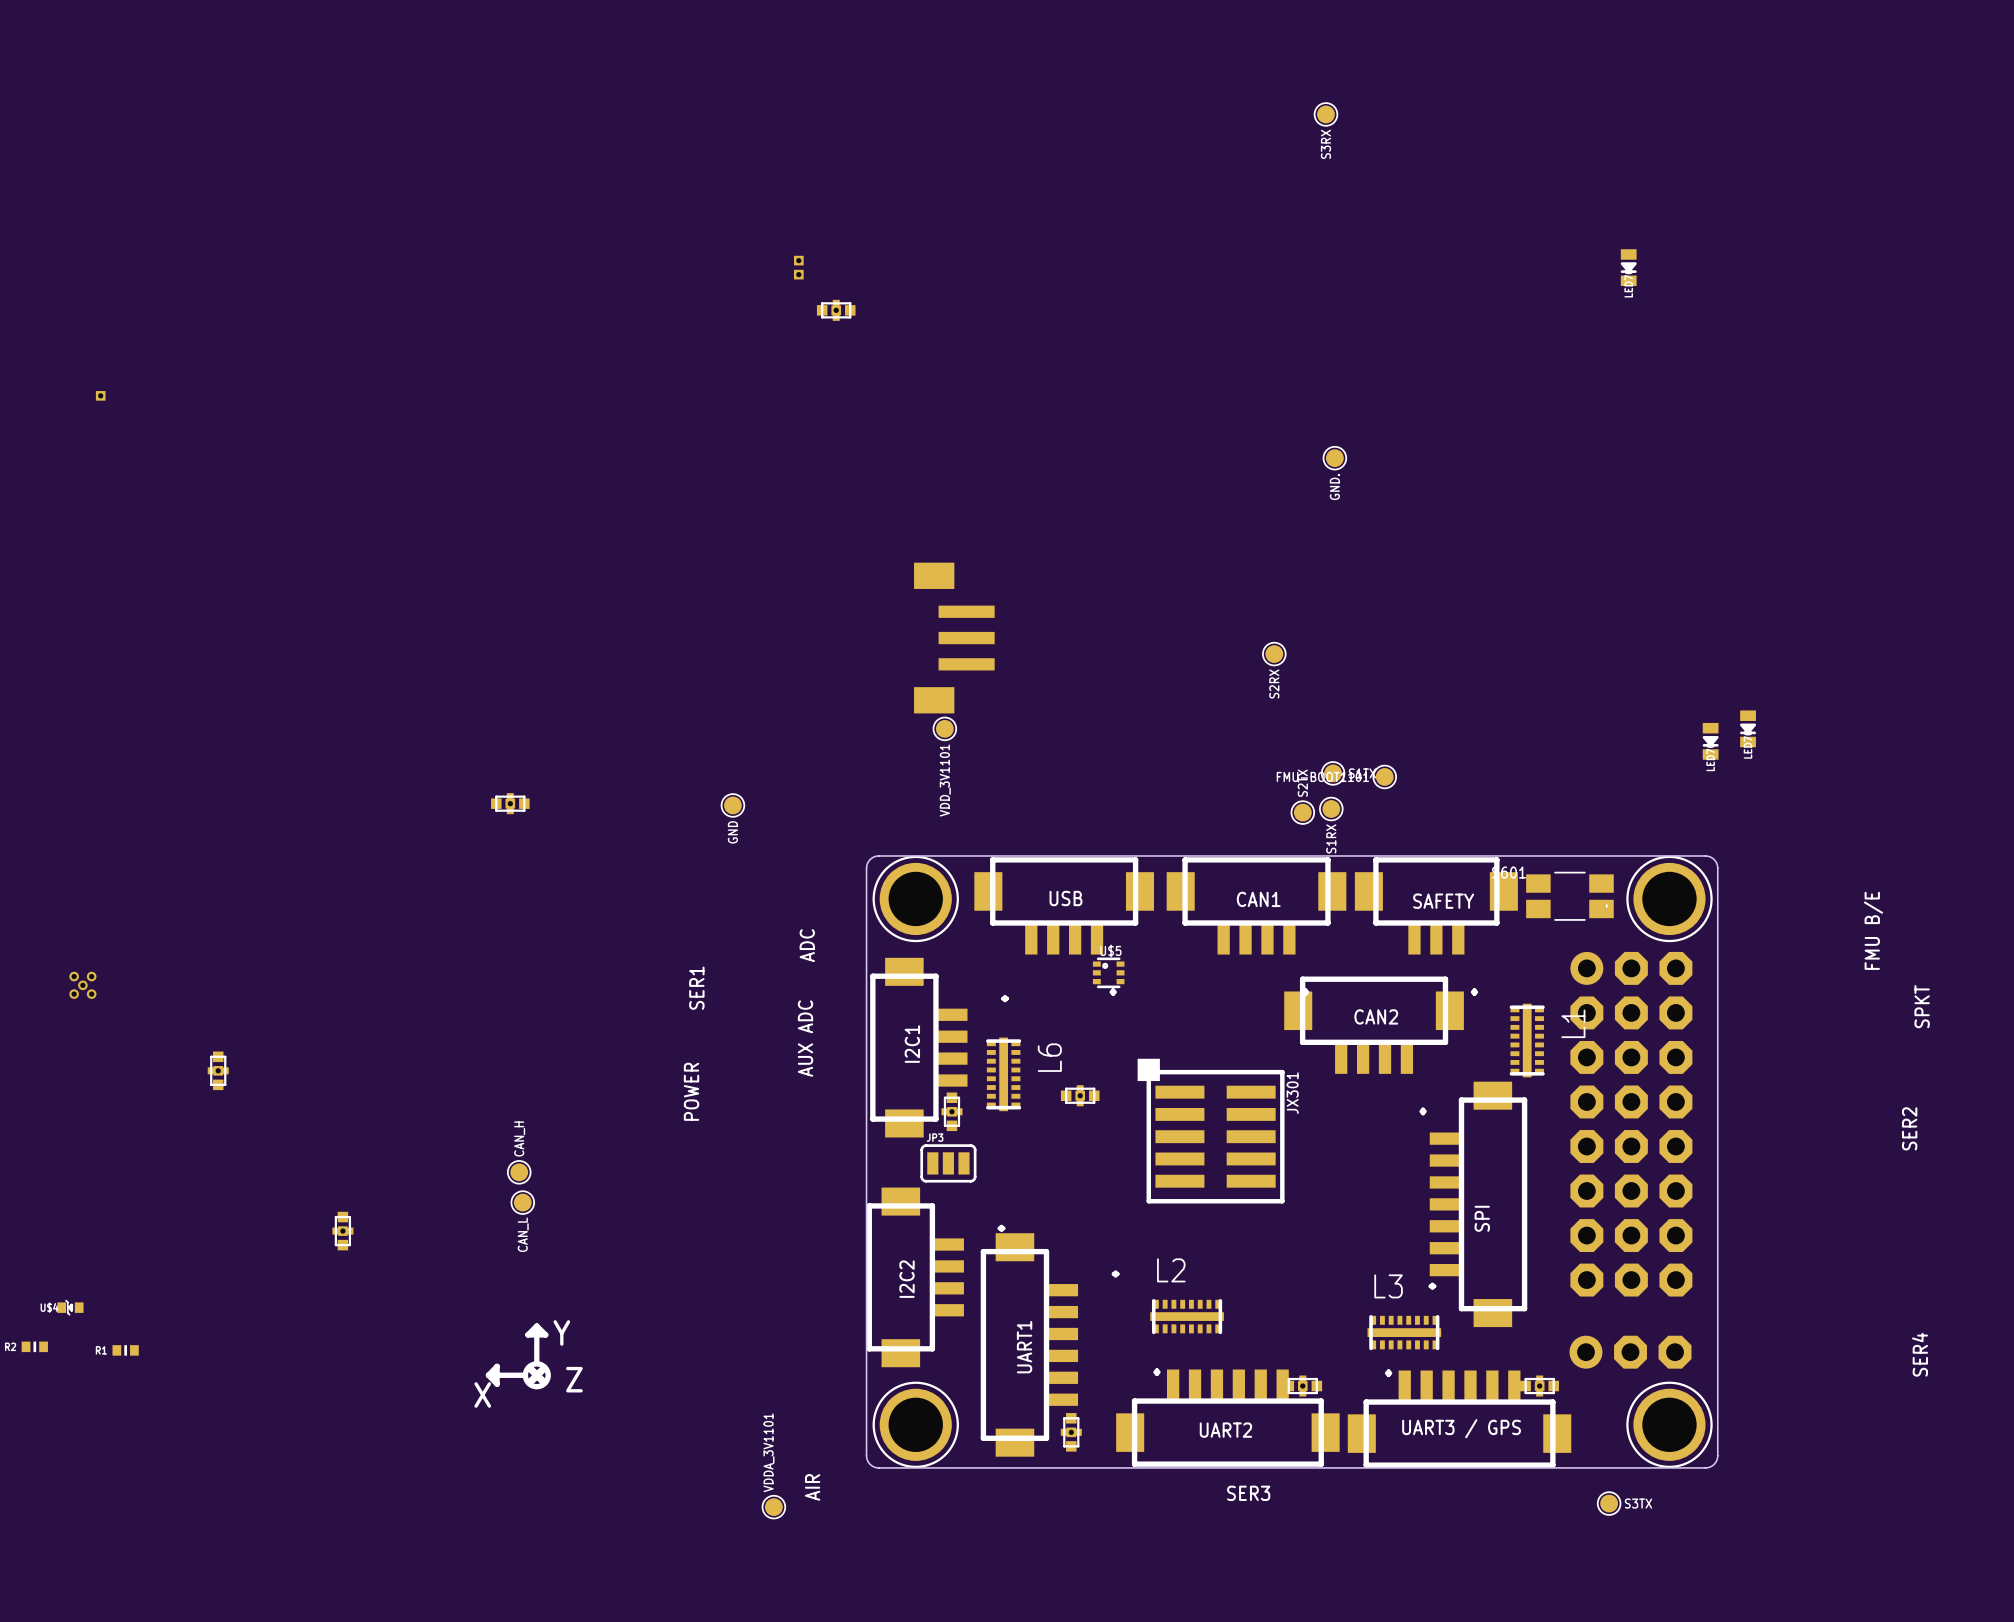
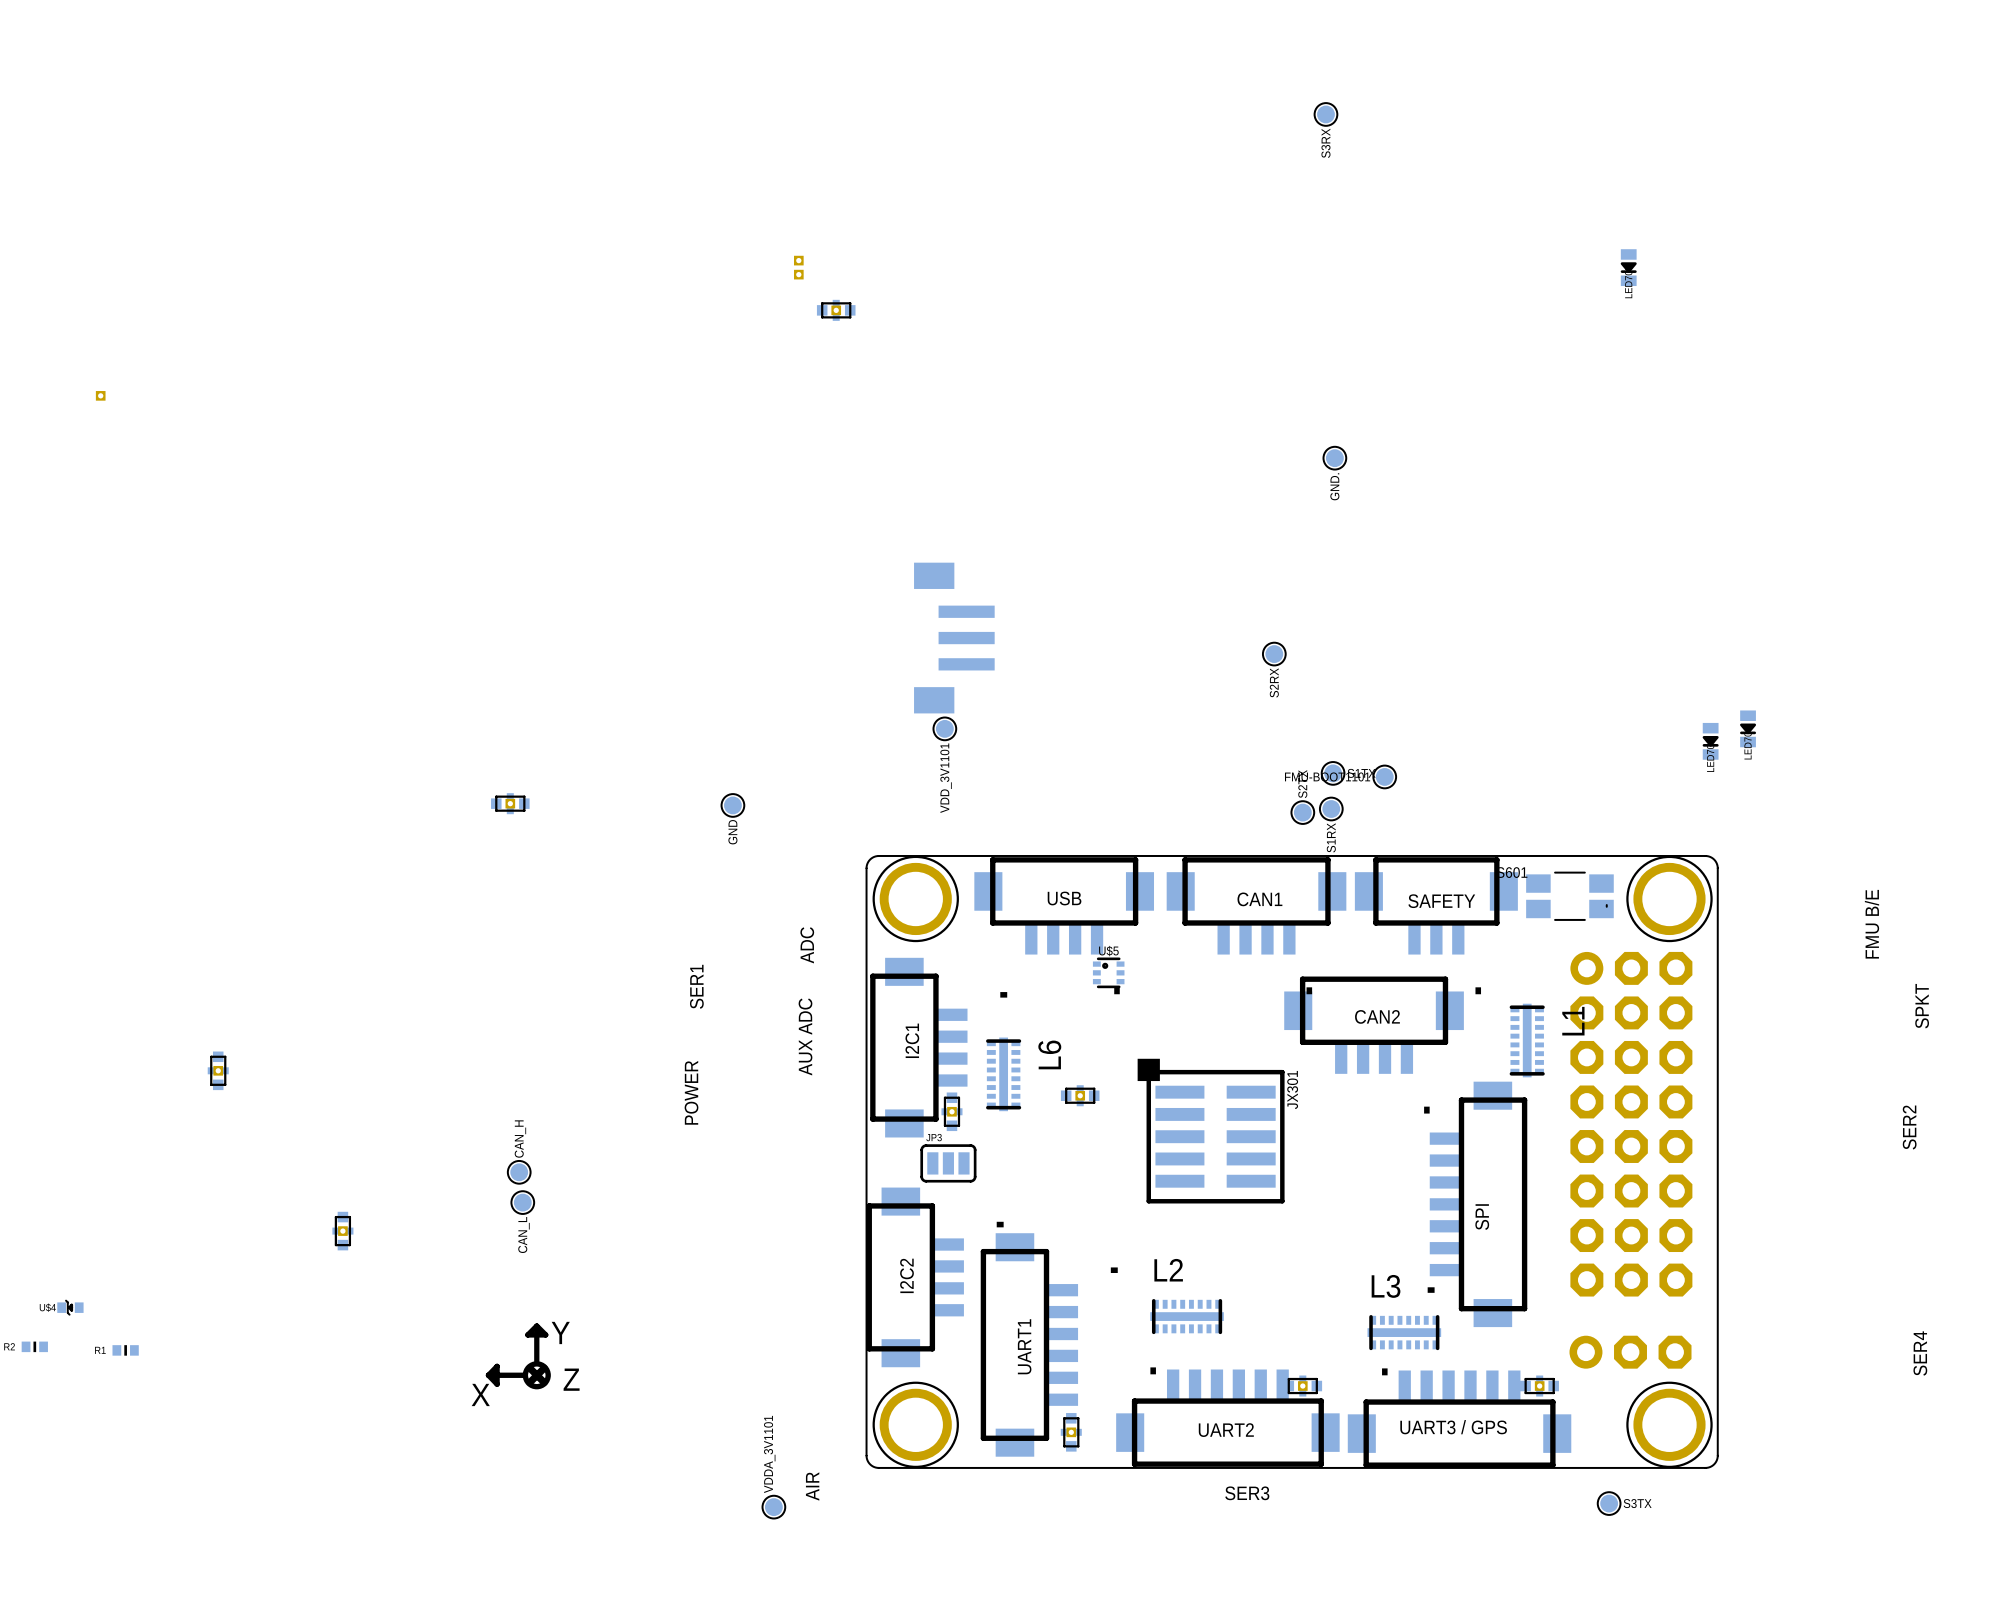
part: (82, 985) -> none

